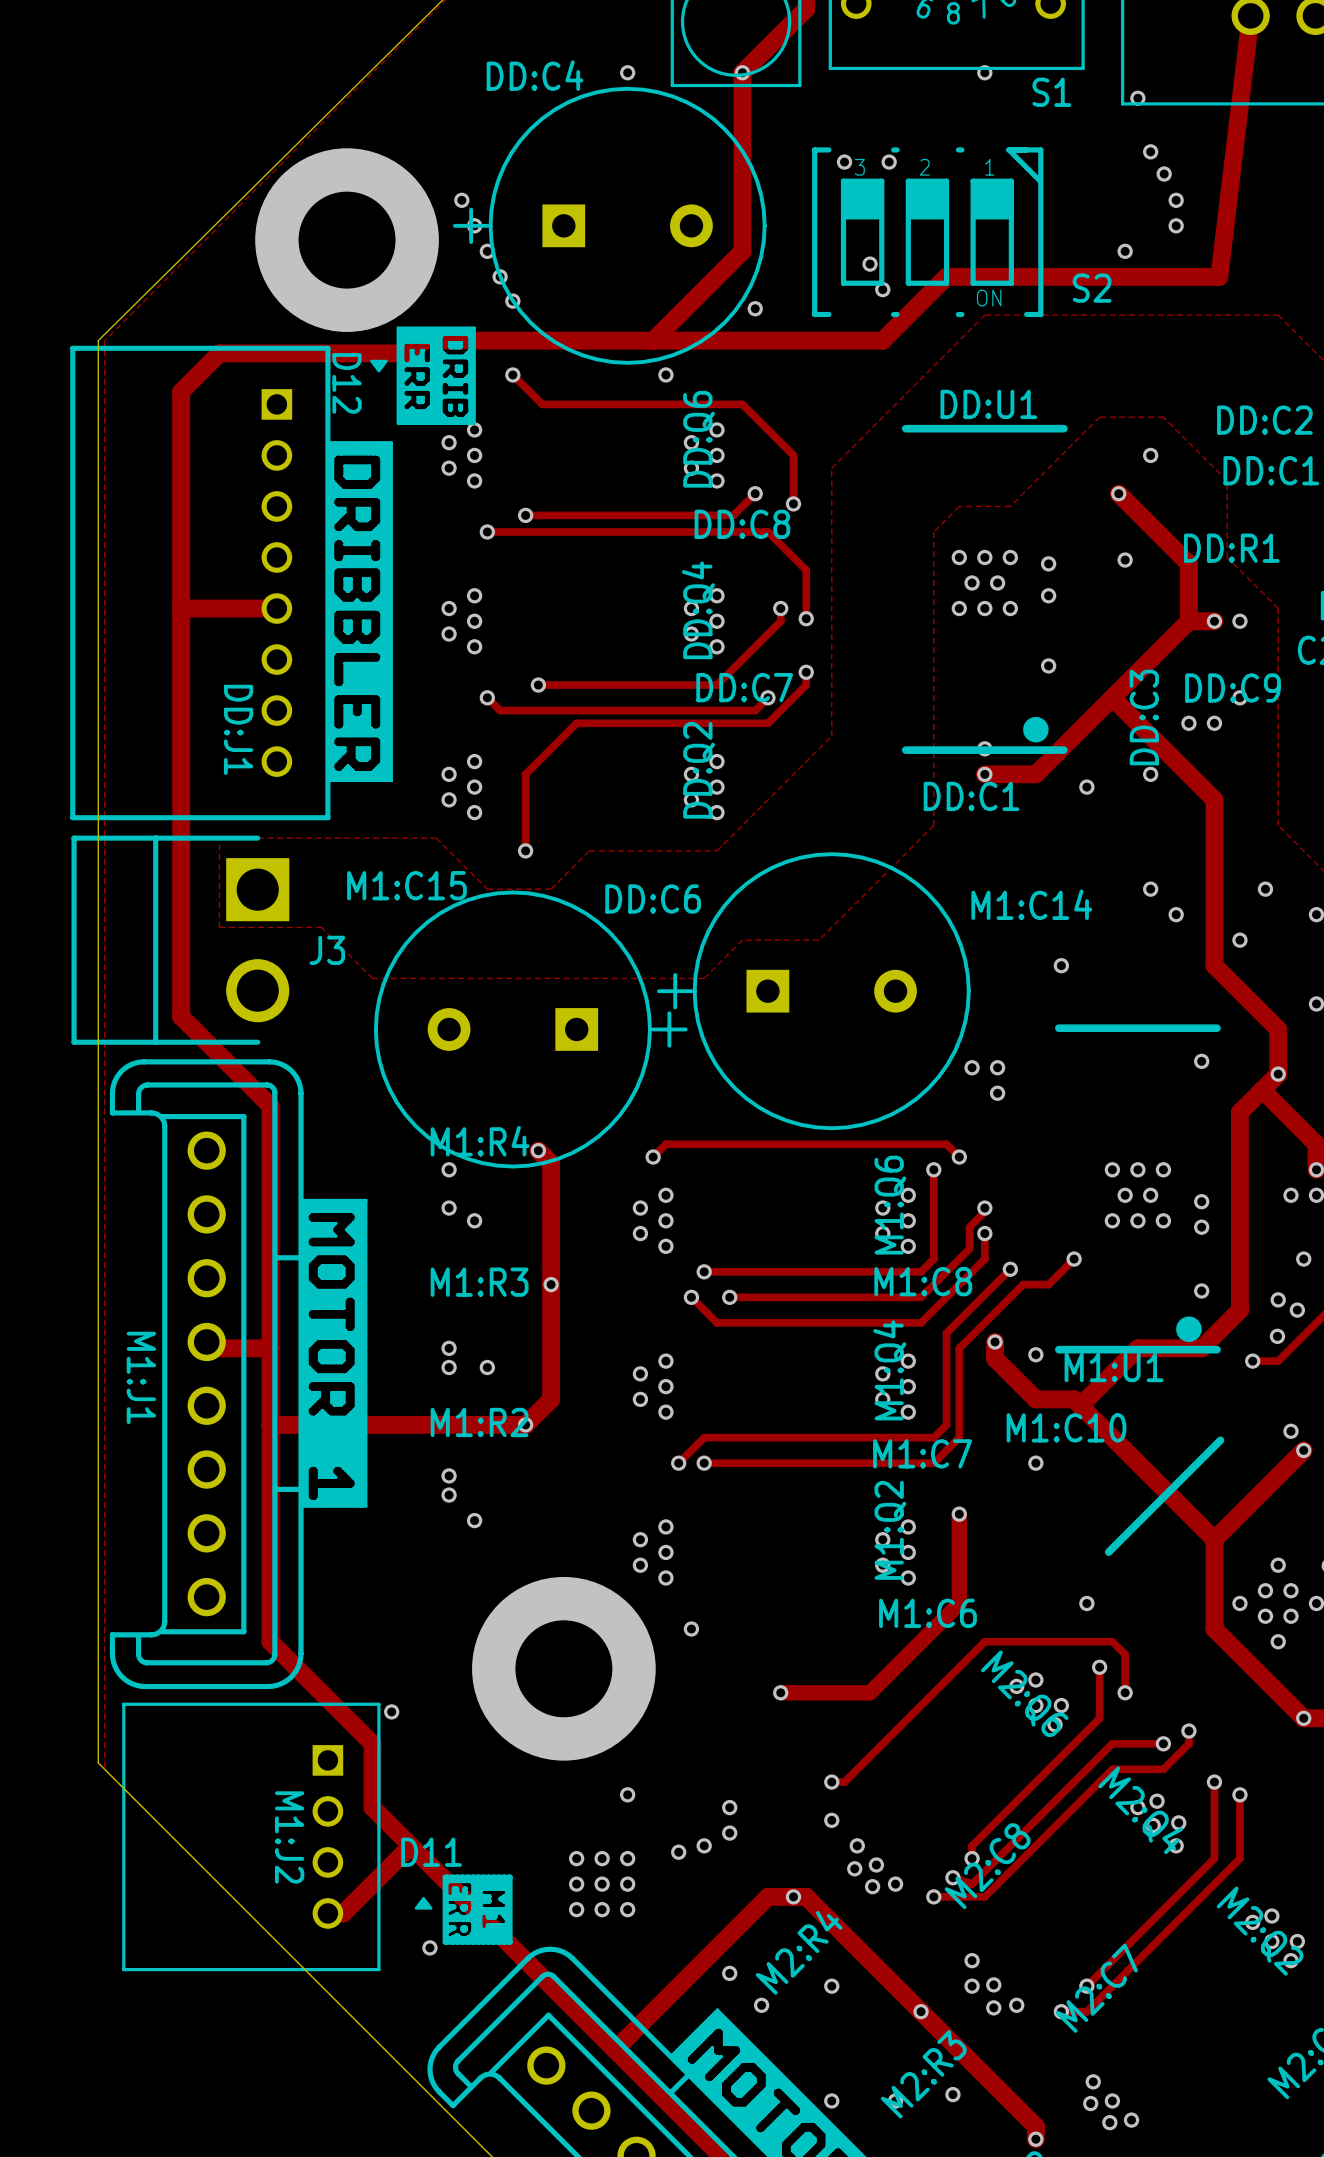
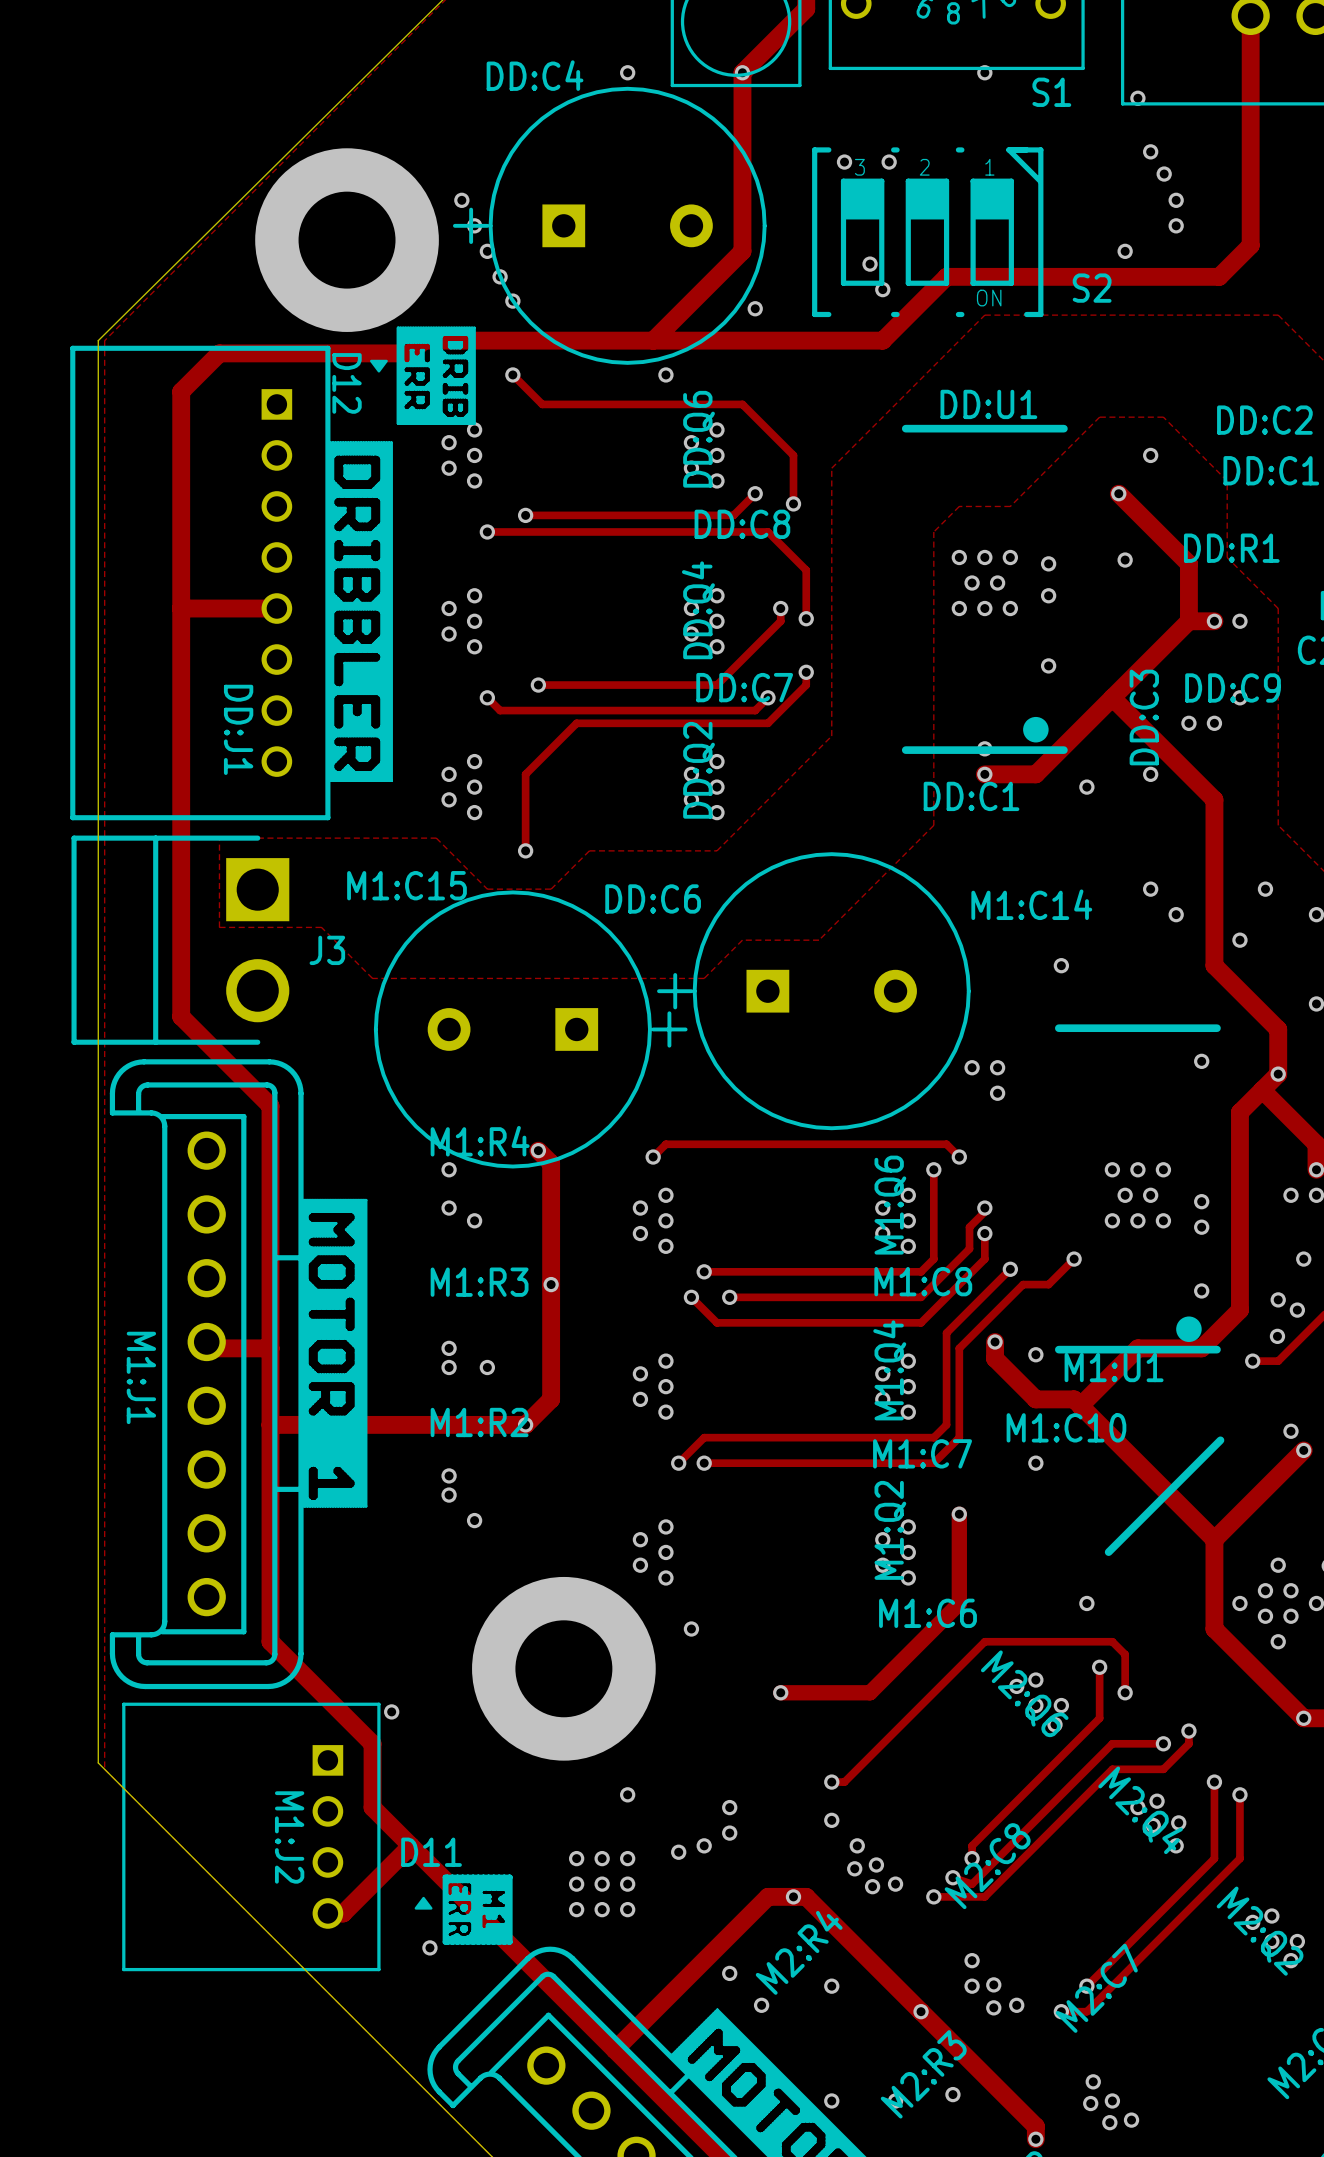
track: (1250, 15) (1219, 276) -> (1250, 15) (1250, 245) (1219, 276)

